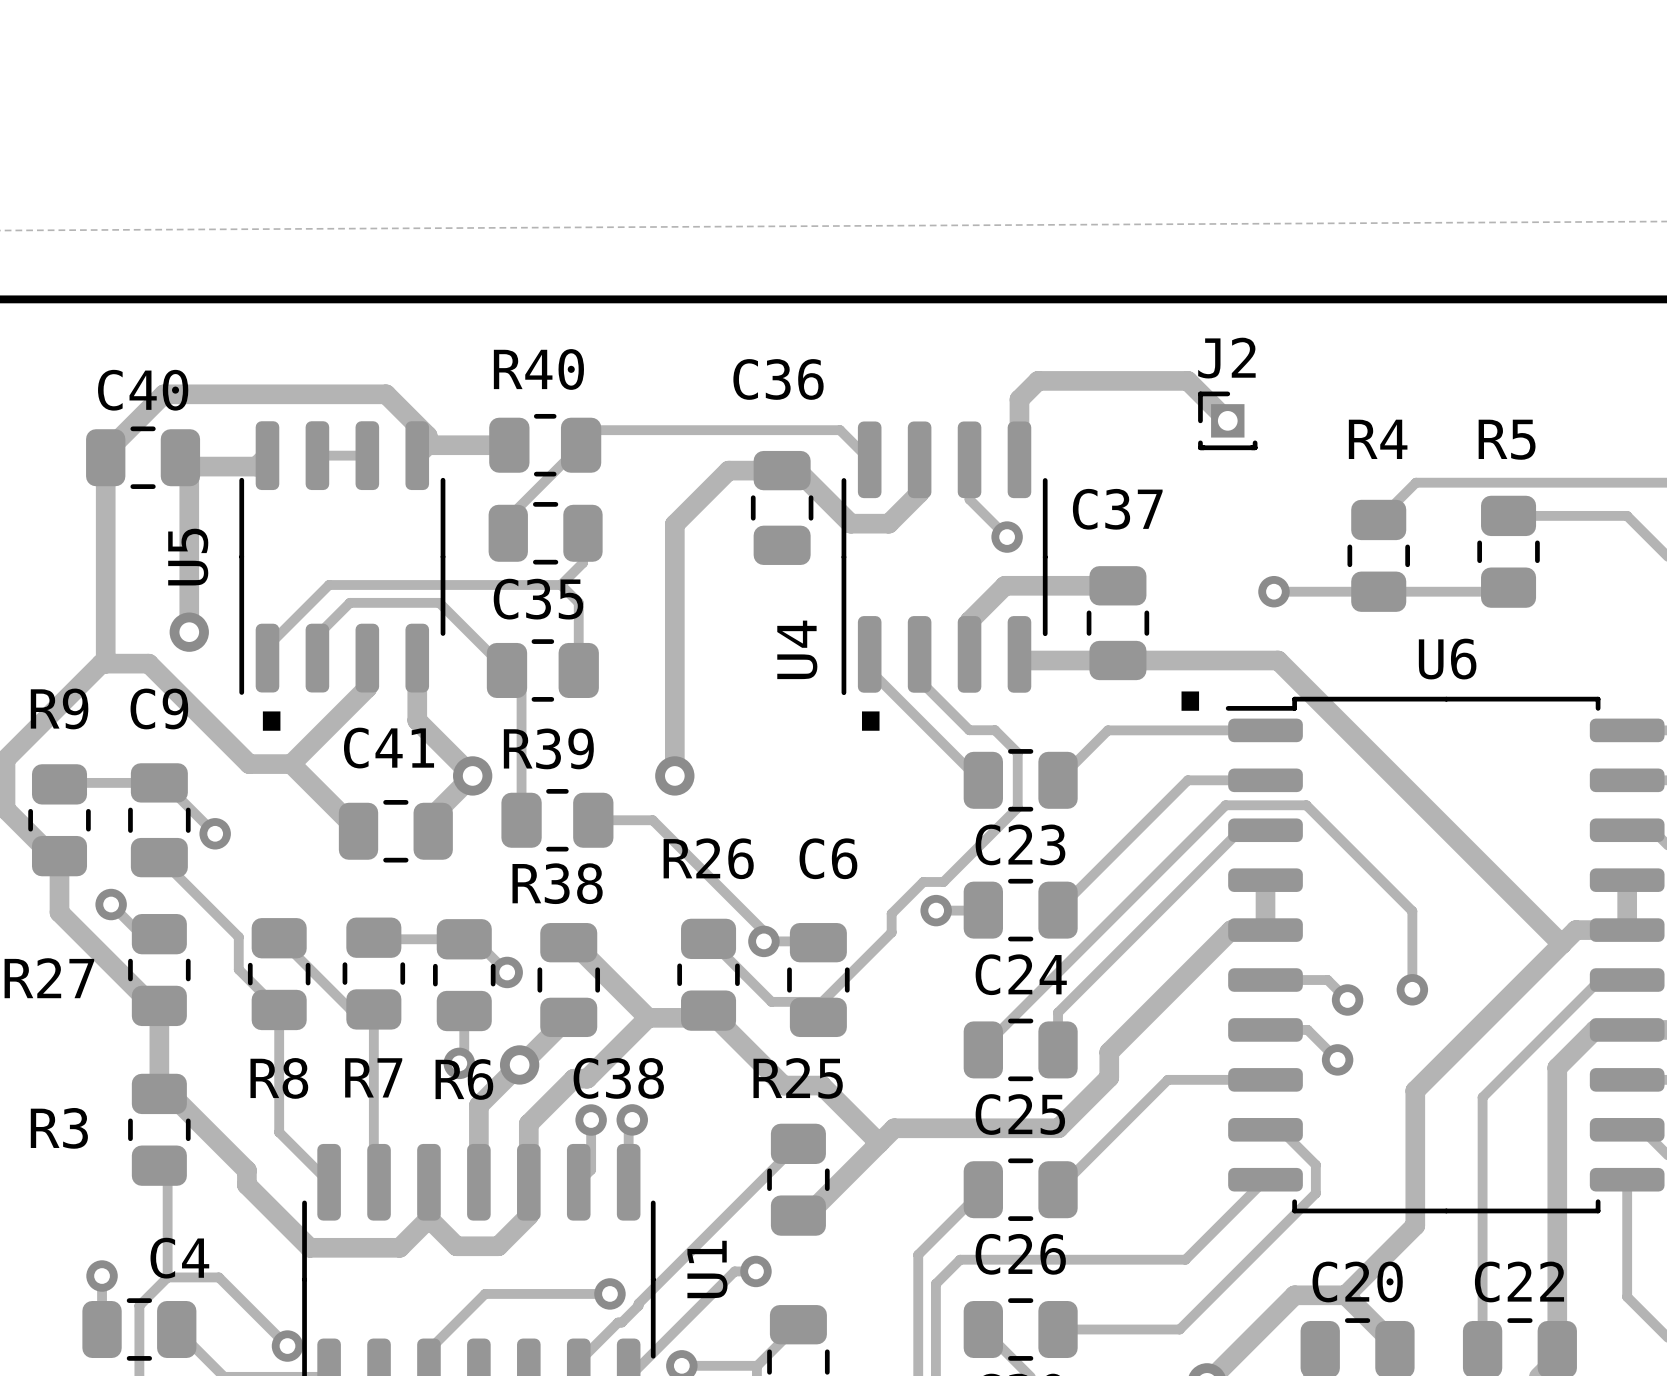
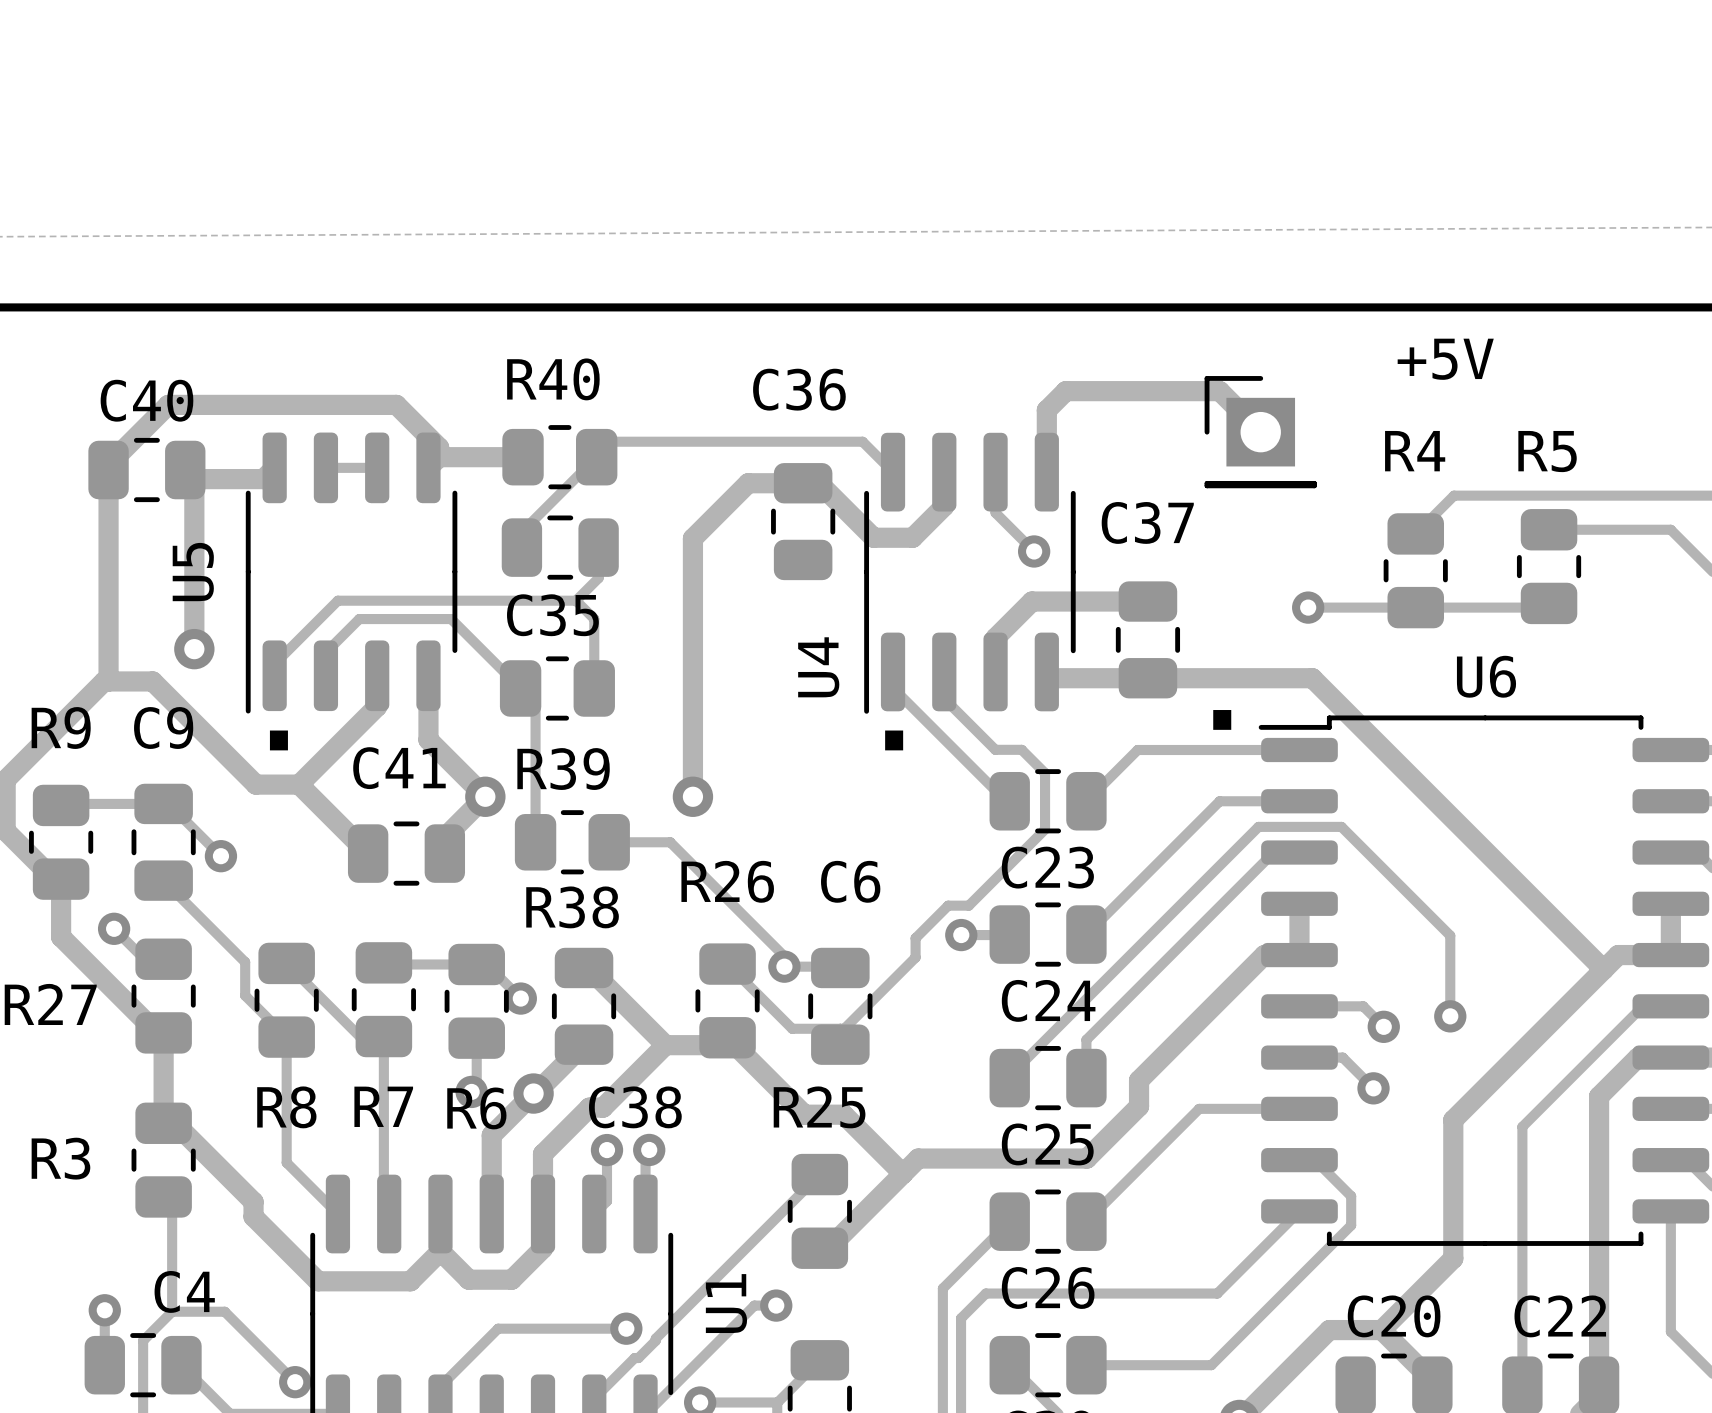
J2: (1227, 420) -> none
+5V: none -> (1260, 432)

